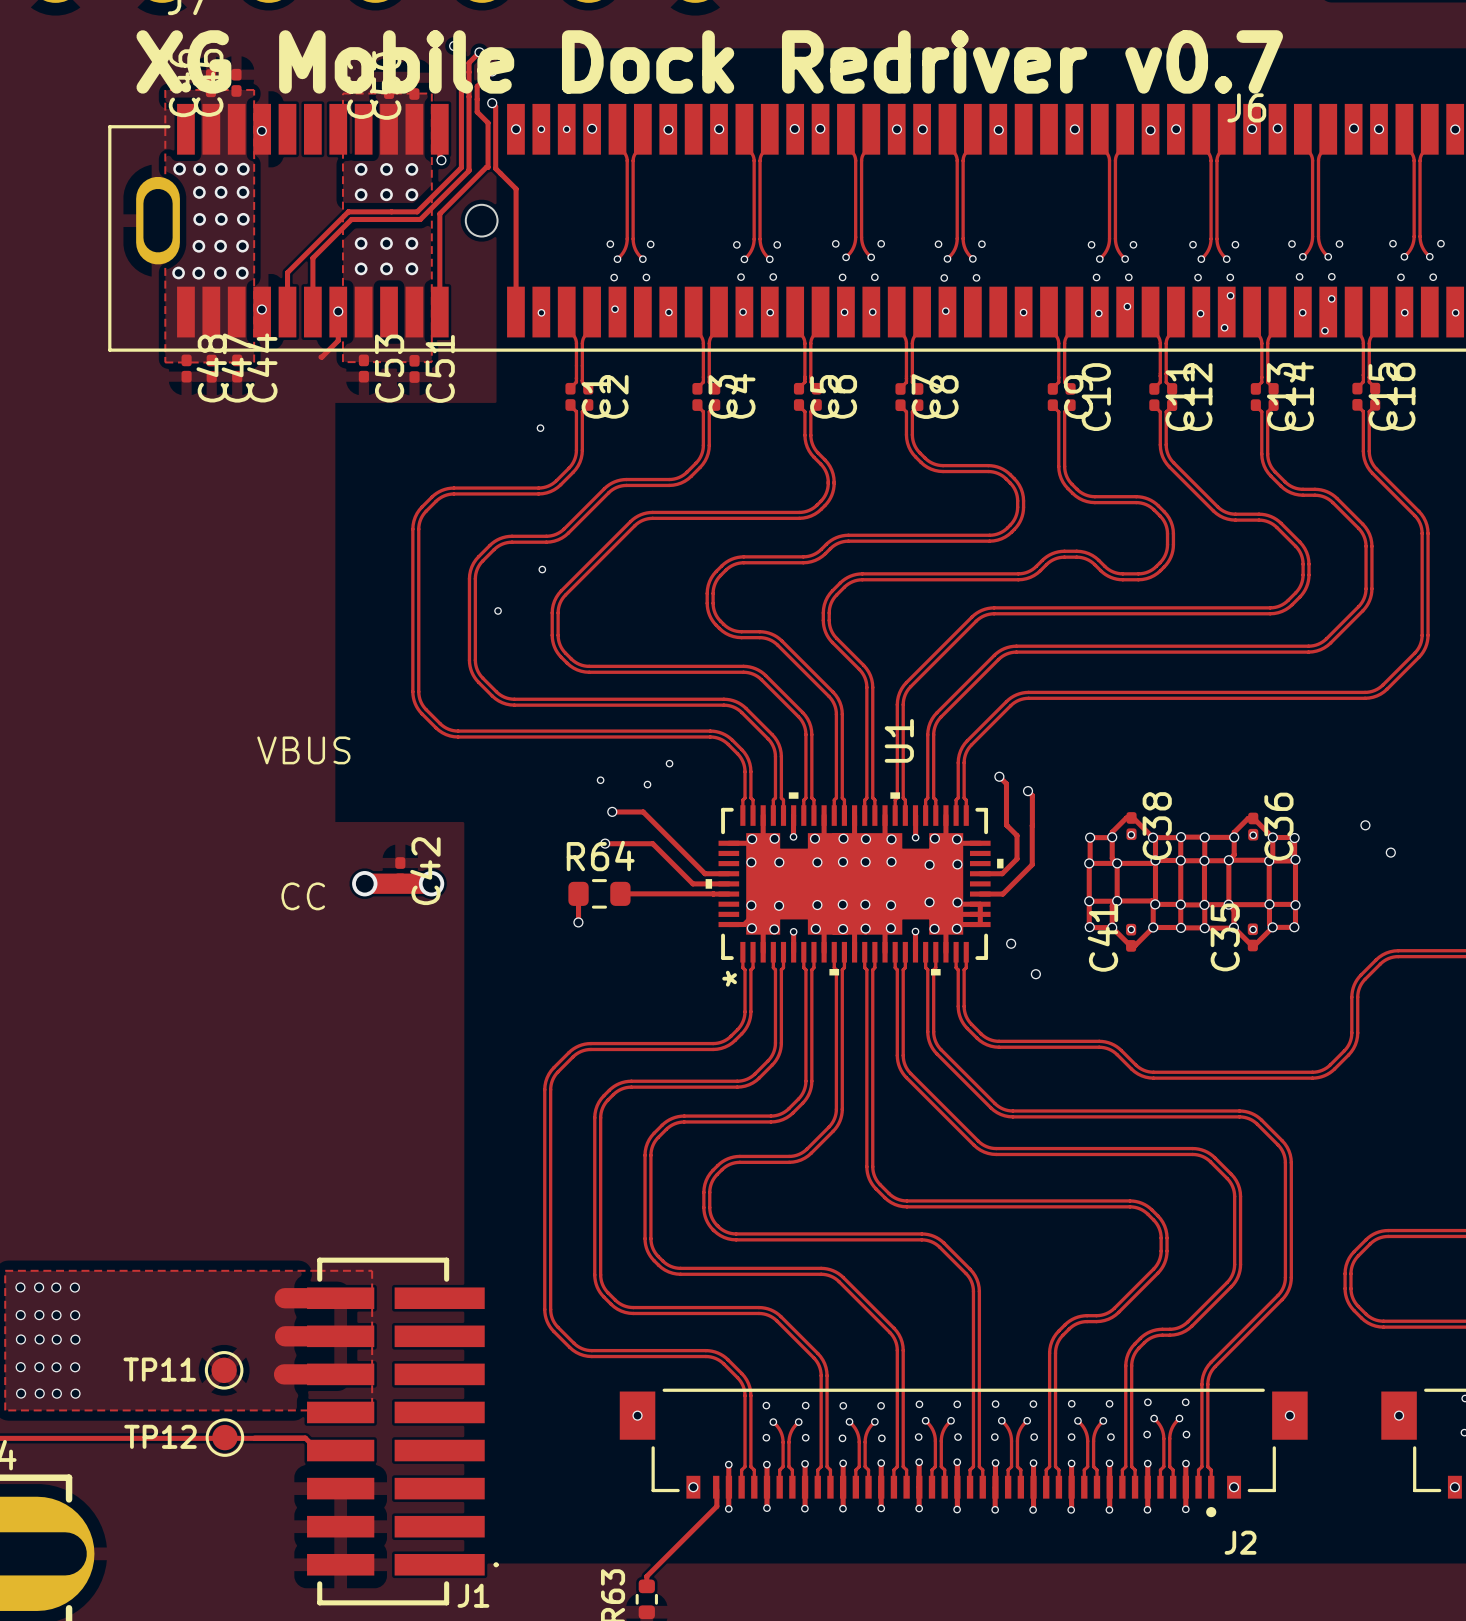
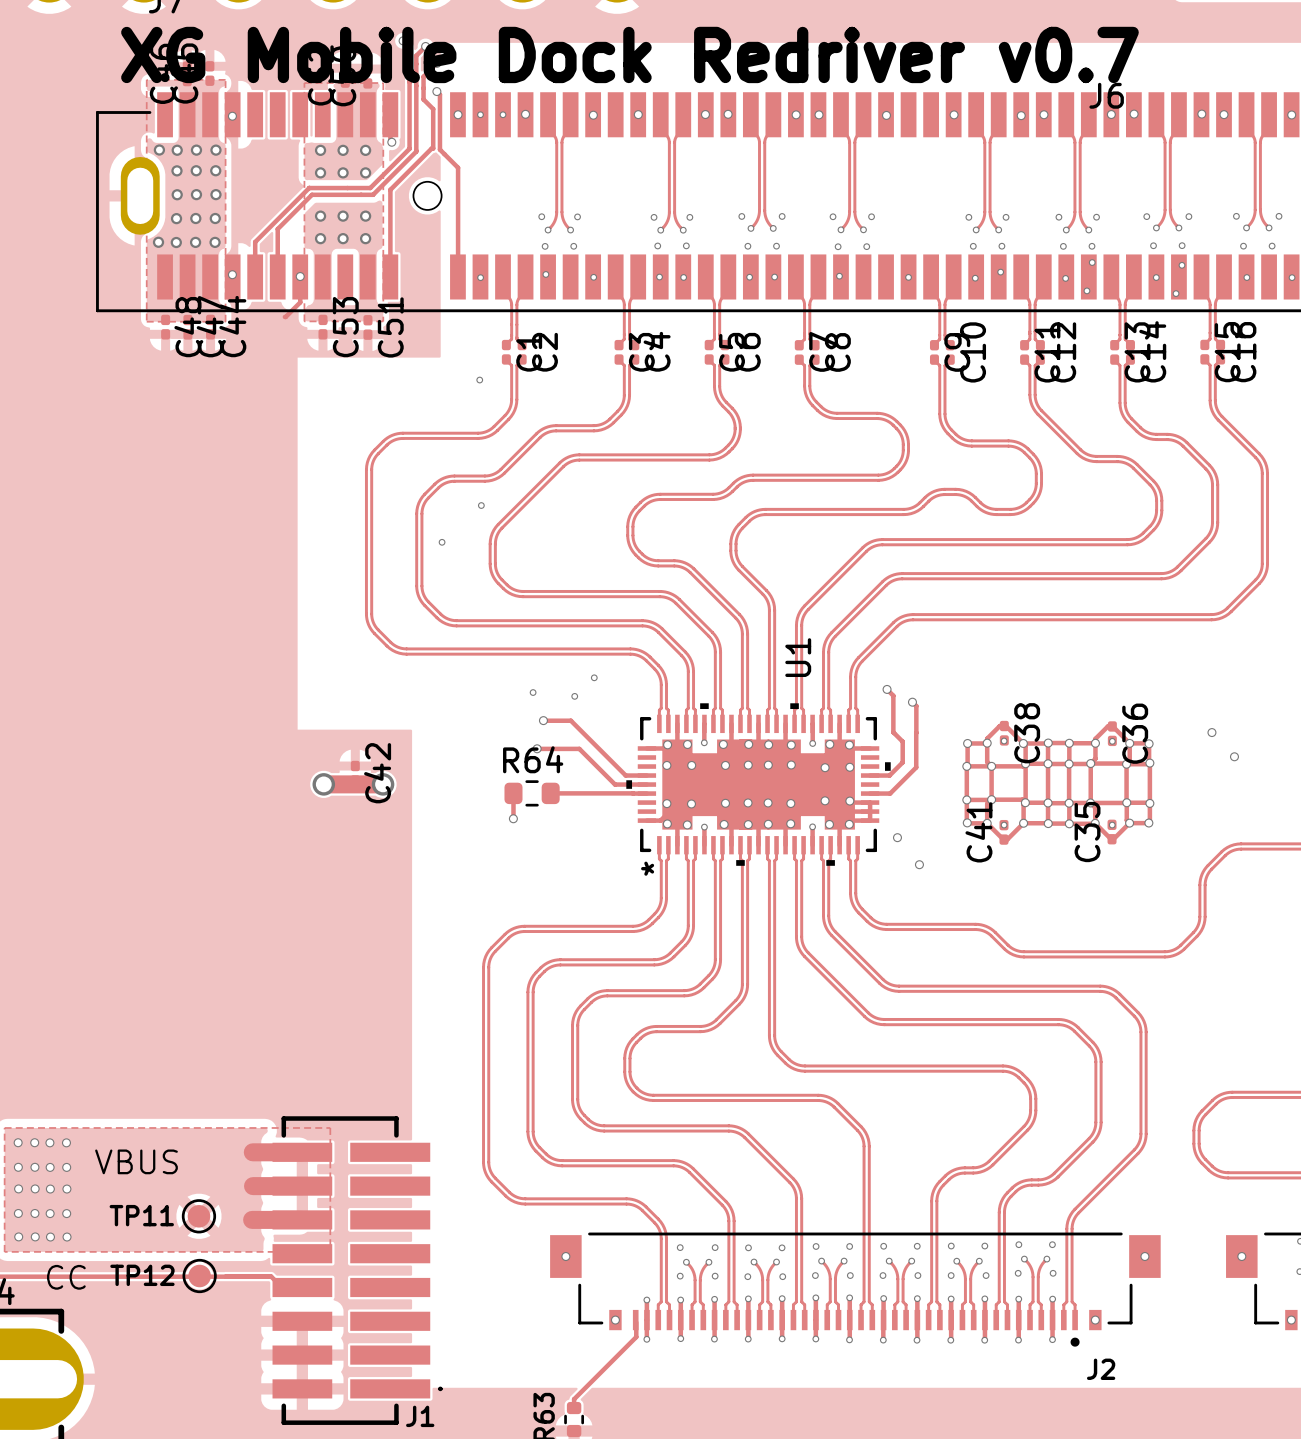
text position: VBUS (303, 750) -> VBUS (136, 1161)
text position: CC (303, 896) -> CC (66, 1277)

